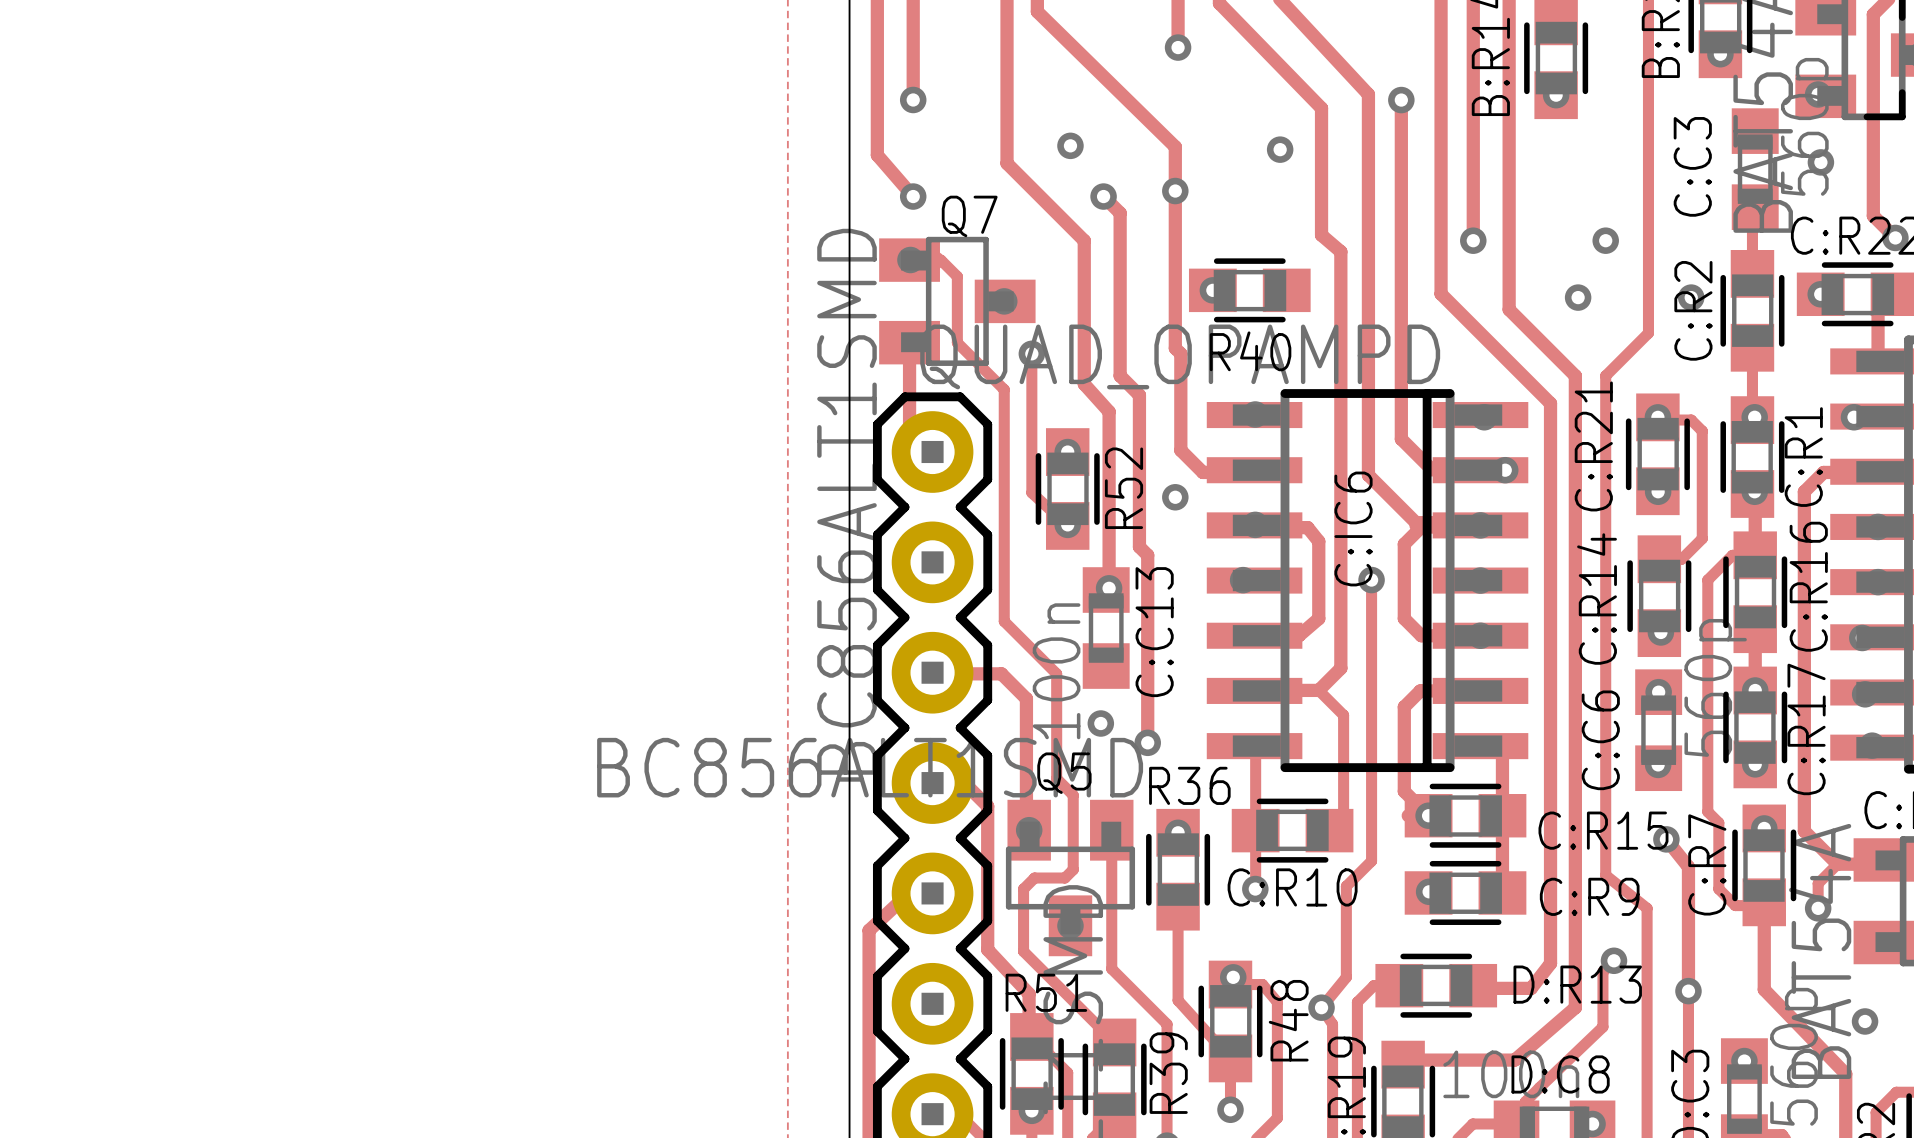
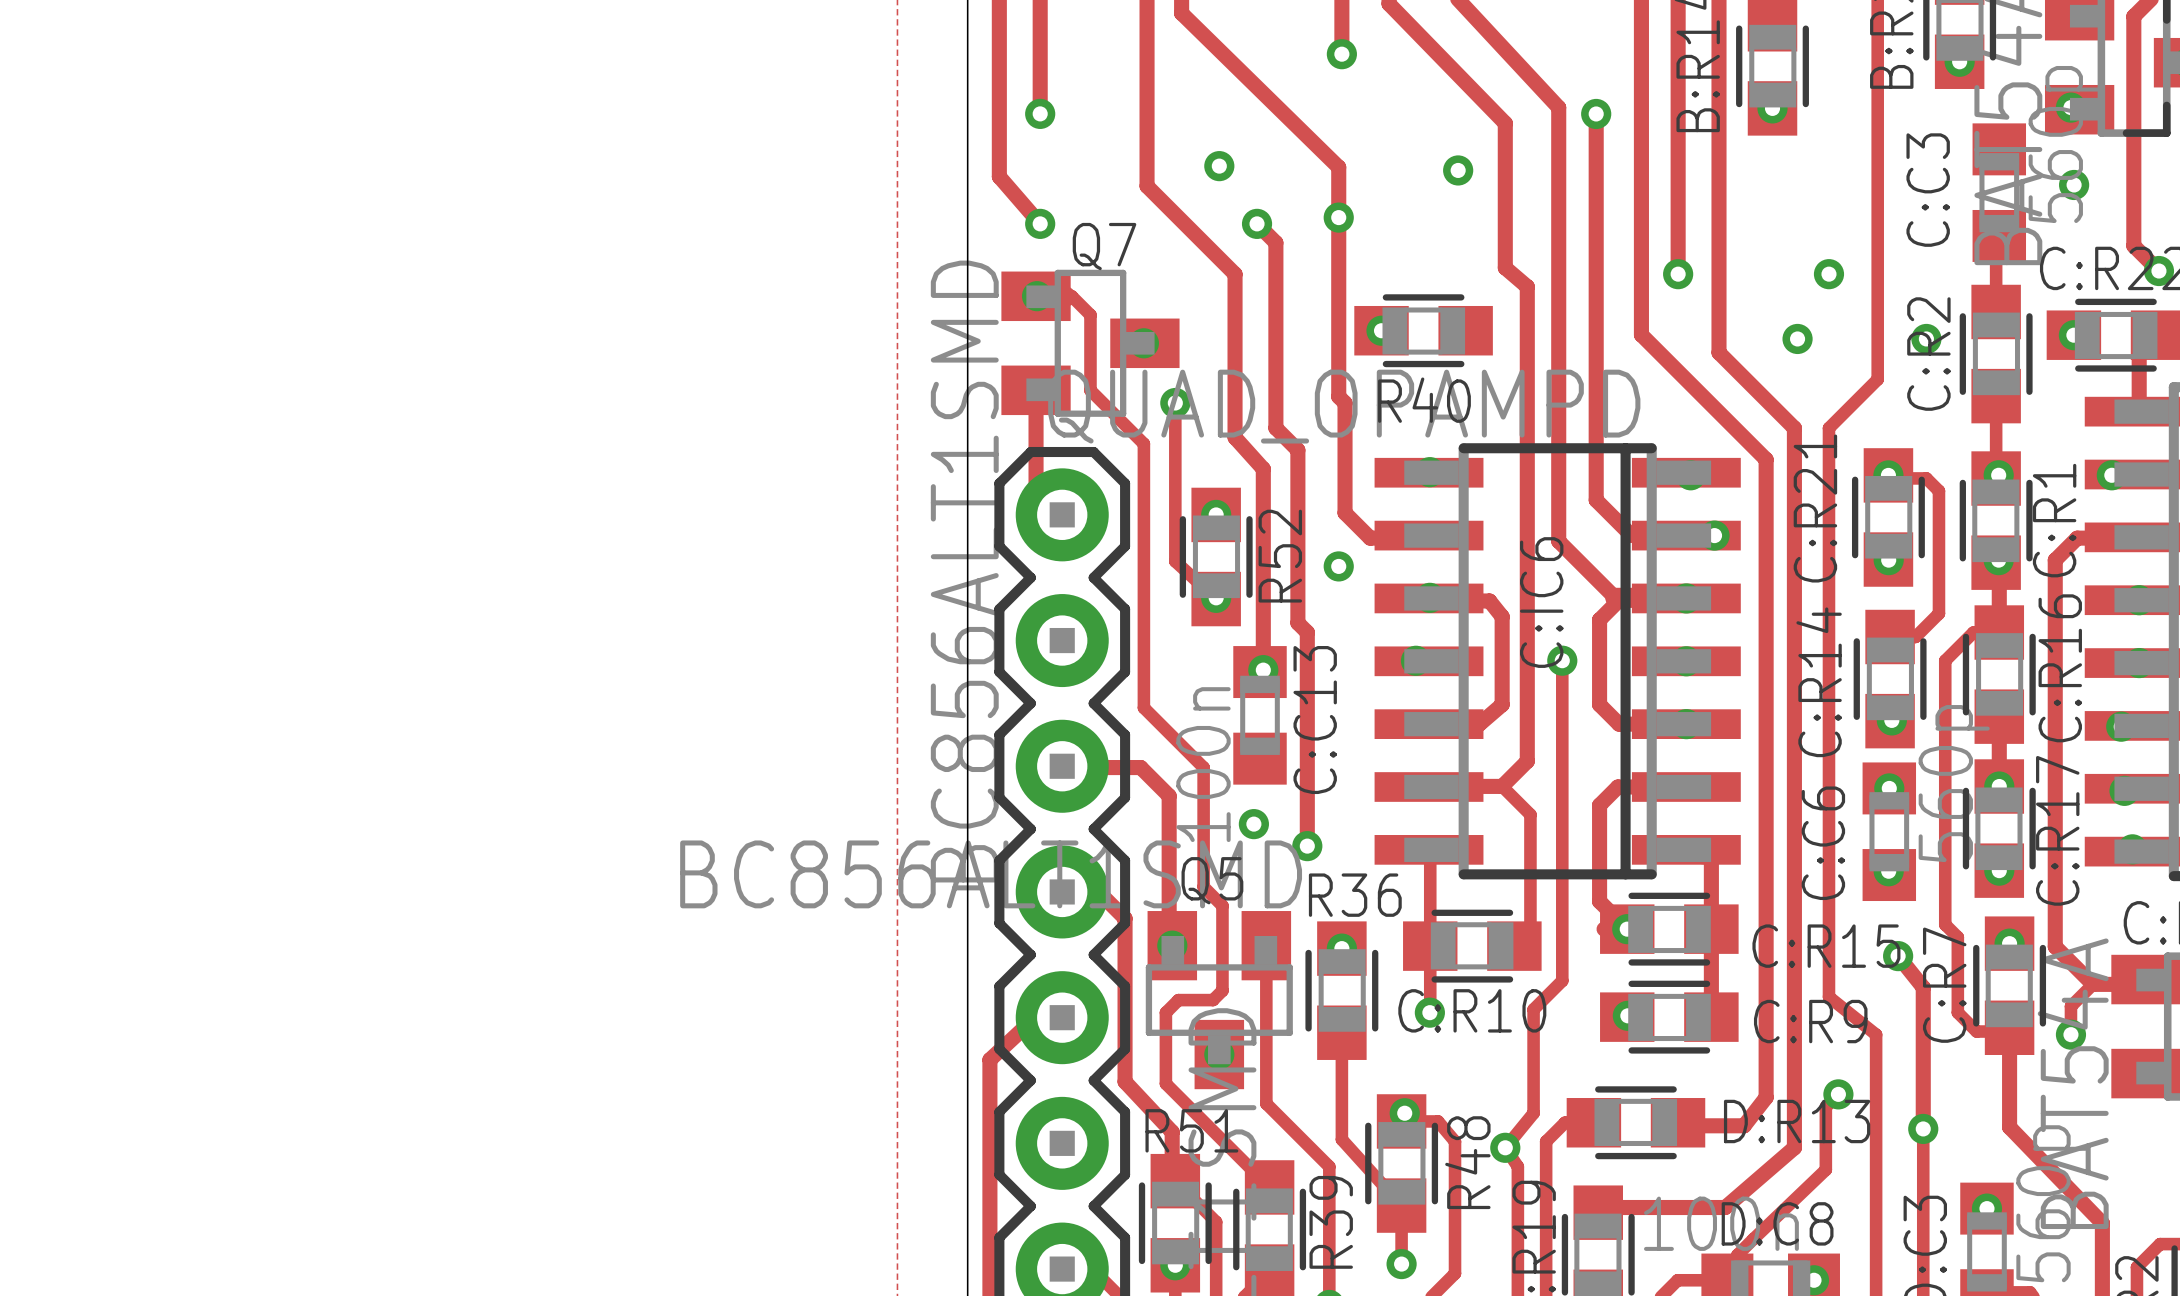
via: (1865, 1021) -> none

